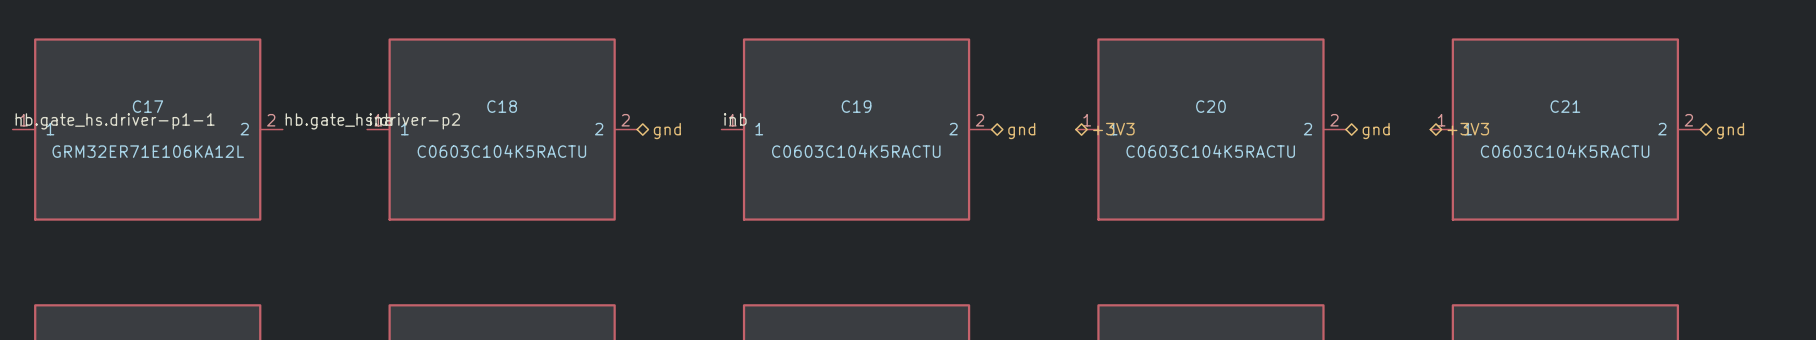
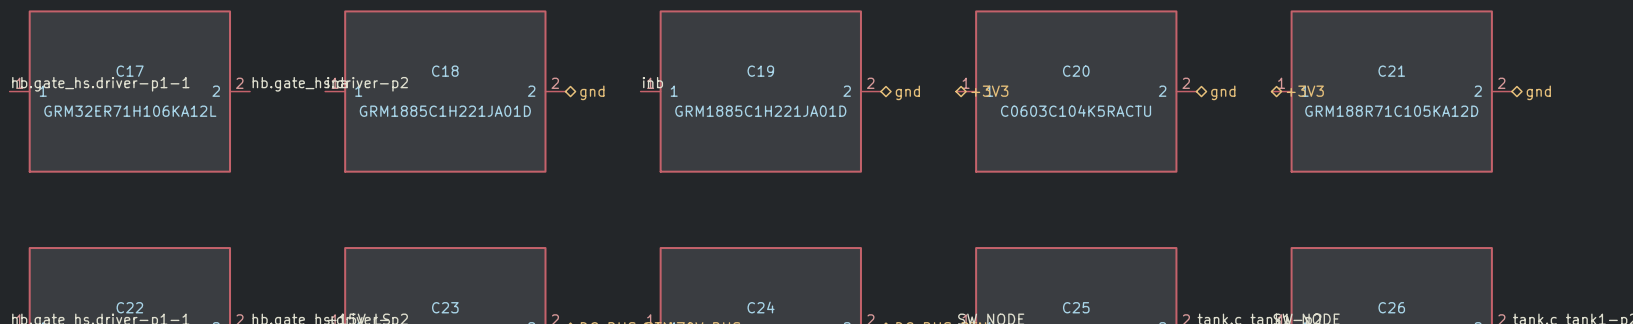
C17 value: GRM32ER71E106KA12L (148, 151) -> GRM32ER71H106KA12L (130, 111)
C18 value: C0603C104K5RACTU (501, 151) -> GRM1885C1H221JA01D (445, 111)
C19 value: C0603C104K5RACTU (856, 151) -> GRM1885C1H221JA01D (760, 111)
C21 value: C0603C104K5RACTU (1565, 151) -> GRM188R71C105KA12D (1391, 111)

